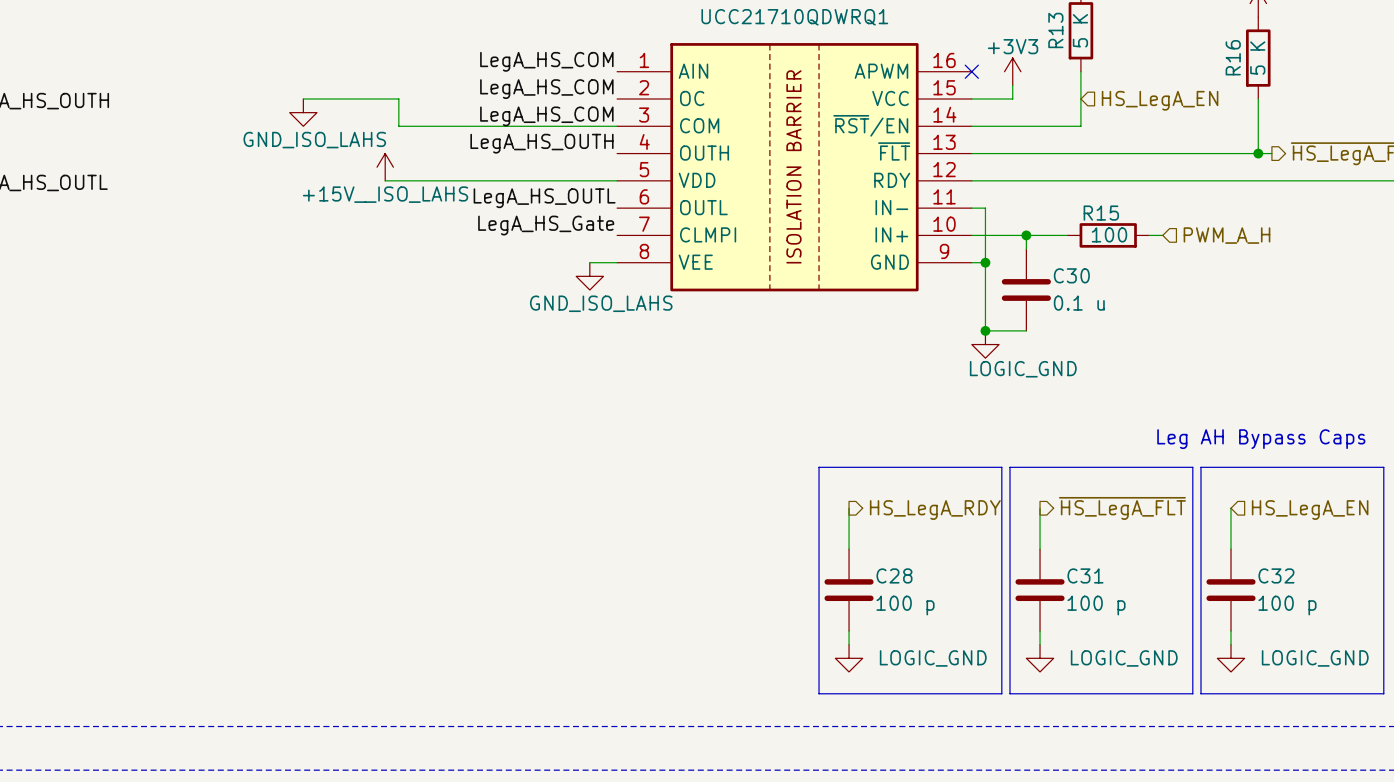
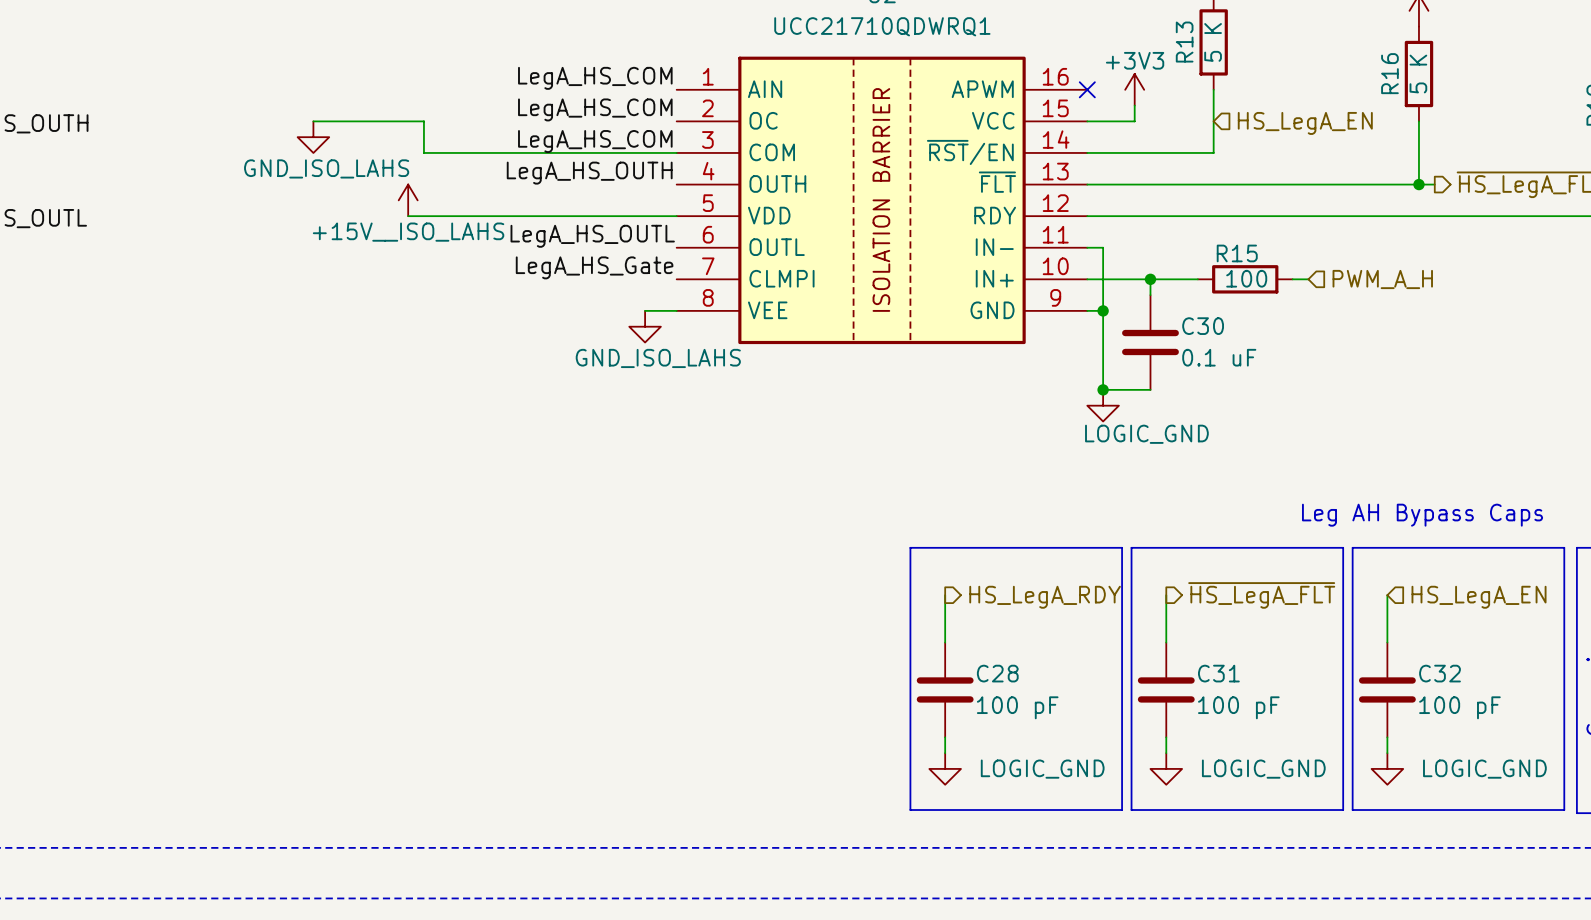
C30 value: 0.1 u (1079, 303) -> 0.1 uF (1219, 357)
C28 value: 100 p (905, 605) -> 100 pF (1017, 707)
C31 value: 100 p (1096, 605) -> 100 pF (1238, 707)
C32 value: 100 p (1287, 605) -> 100 pF (1459, 707)

